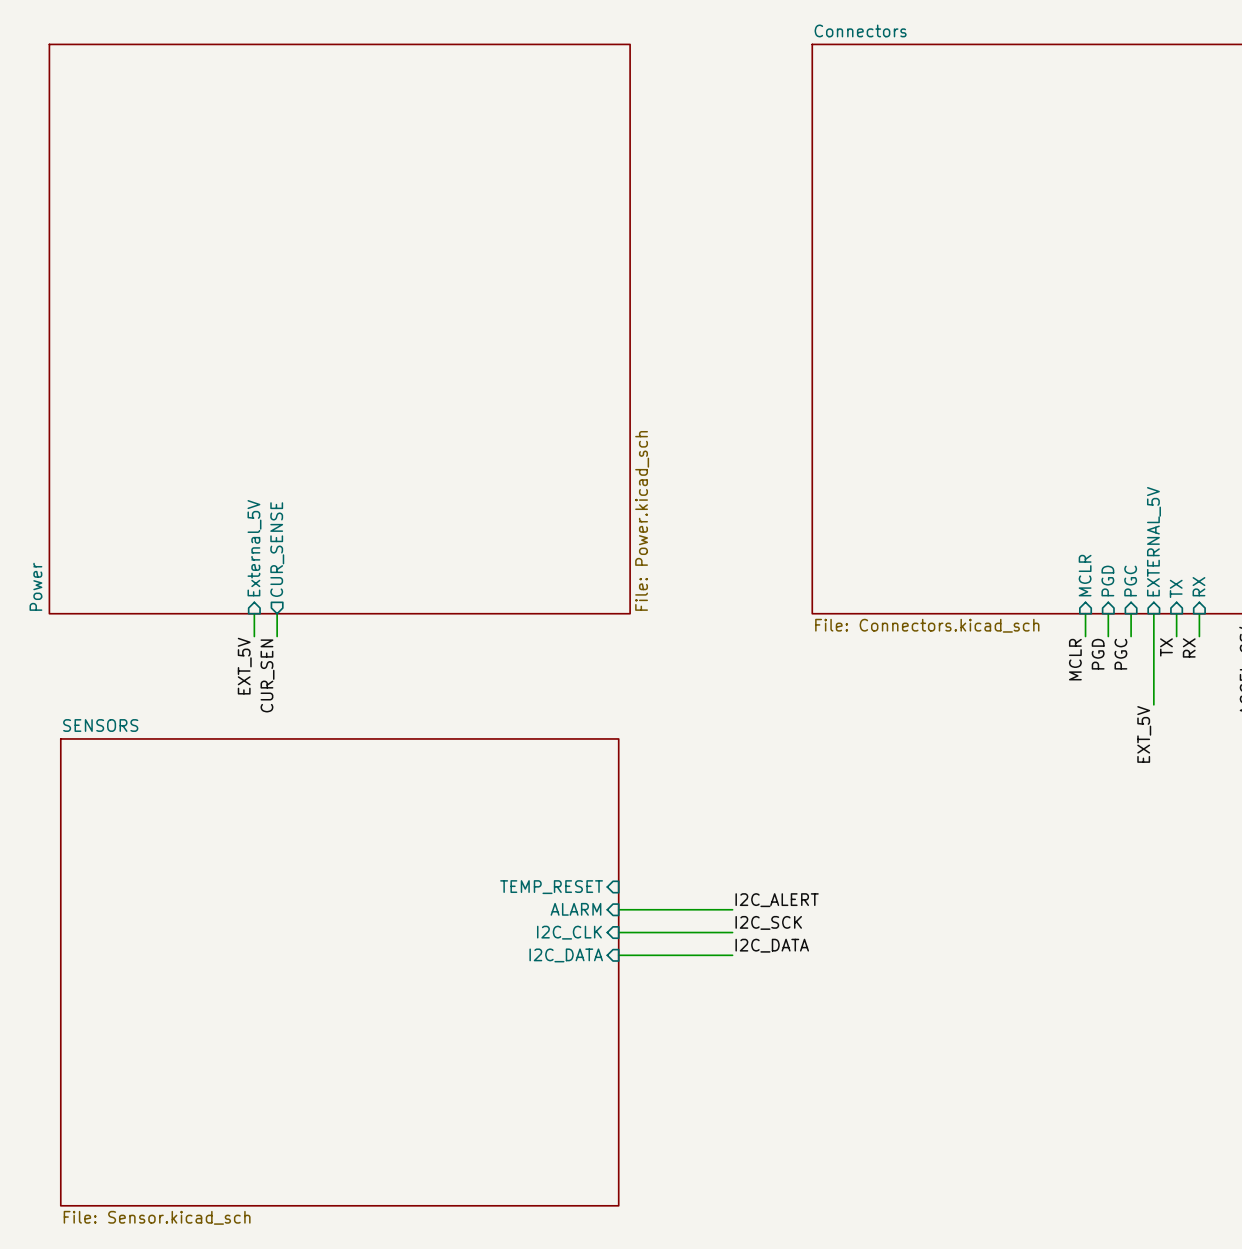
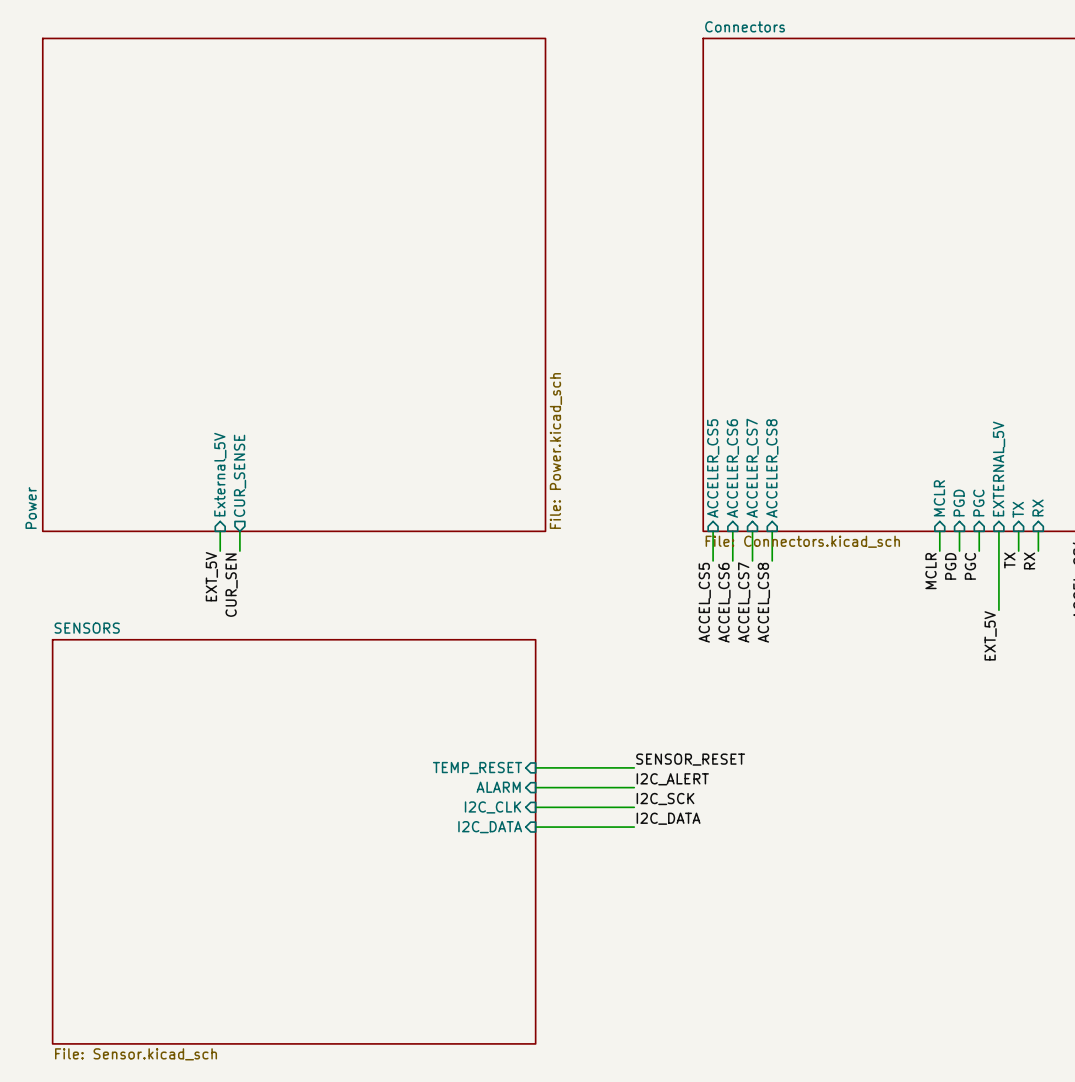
sheet pin: none -> ACCELER_CS7 (752, 468)
sheet pin: none -> ACCELER_CS5 (713, 468)
sheet pin: none -> ACCELER_CS6 (732, 468)
sheet pin: none -> ACCELER_CS8 (772, 468)
wire: none -> (713, 531) (713, 560)
wire: none -> (732, 531) (732, 560)
wire: none -> (752, 531) (752, 560)
wire: none -> (772, 531) (772, 560)
label: none -> ACCEL_CS7 (744, 602)
label: none -> ACCEL_CS5 (704, 602)
label: none -> ACCEL_CS6 (724, 602)
label: none -> ACCEL_CS8 (763, 602)
label: none -> SENSOR_RESET (690, 759)
wire: none -> (535, 767) (634, 767)

